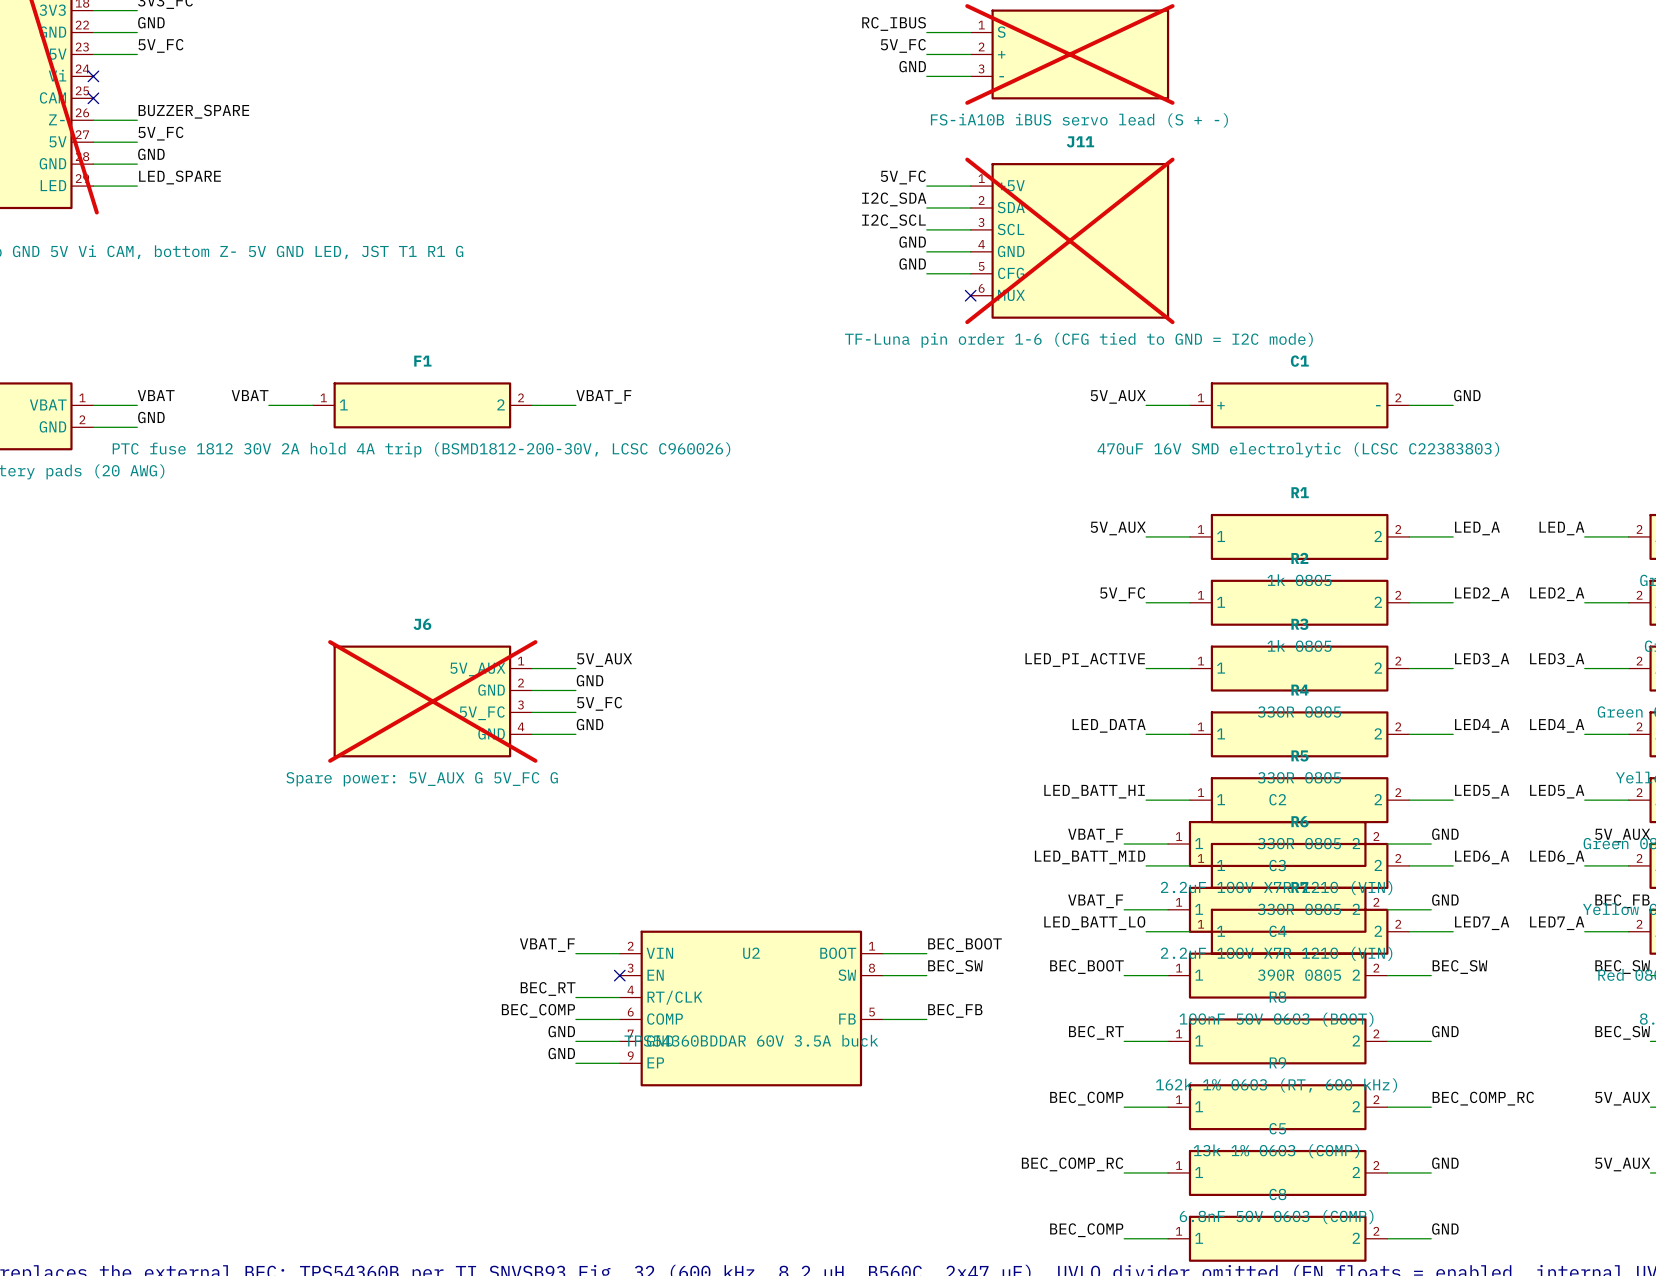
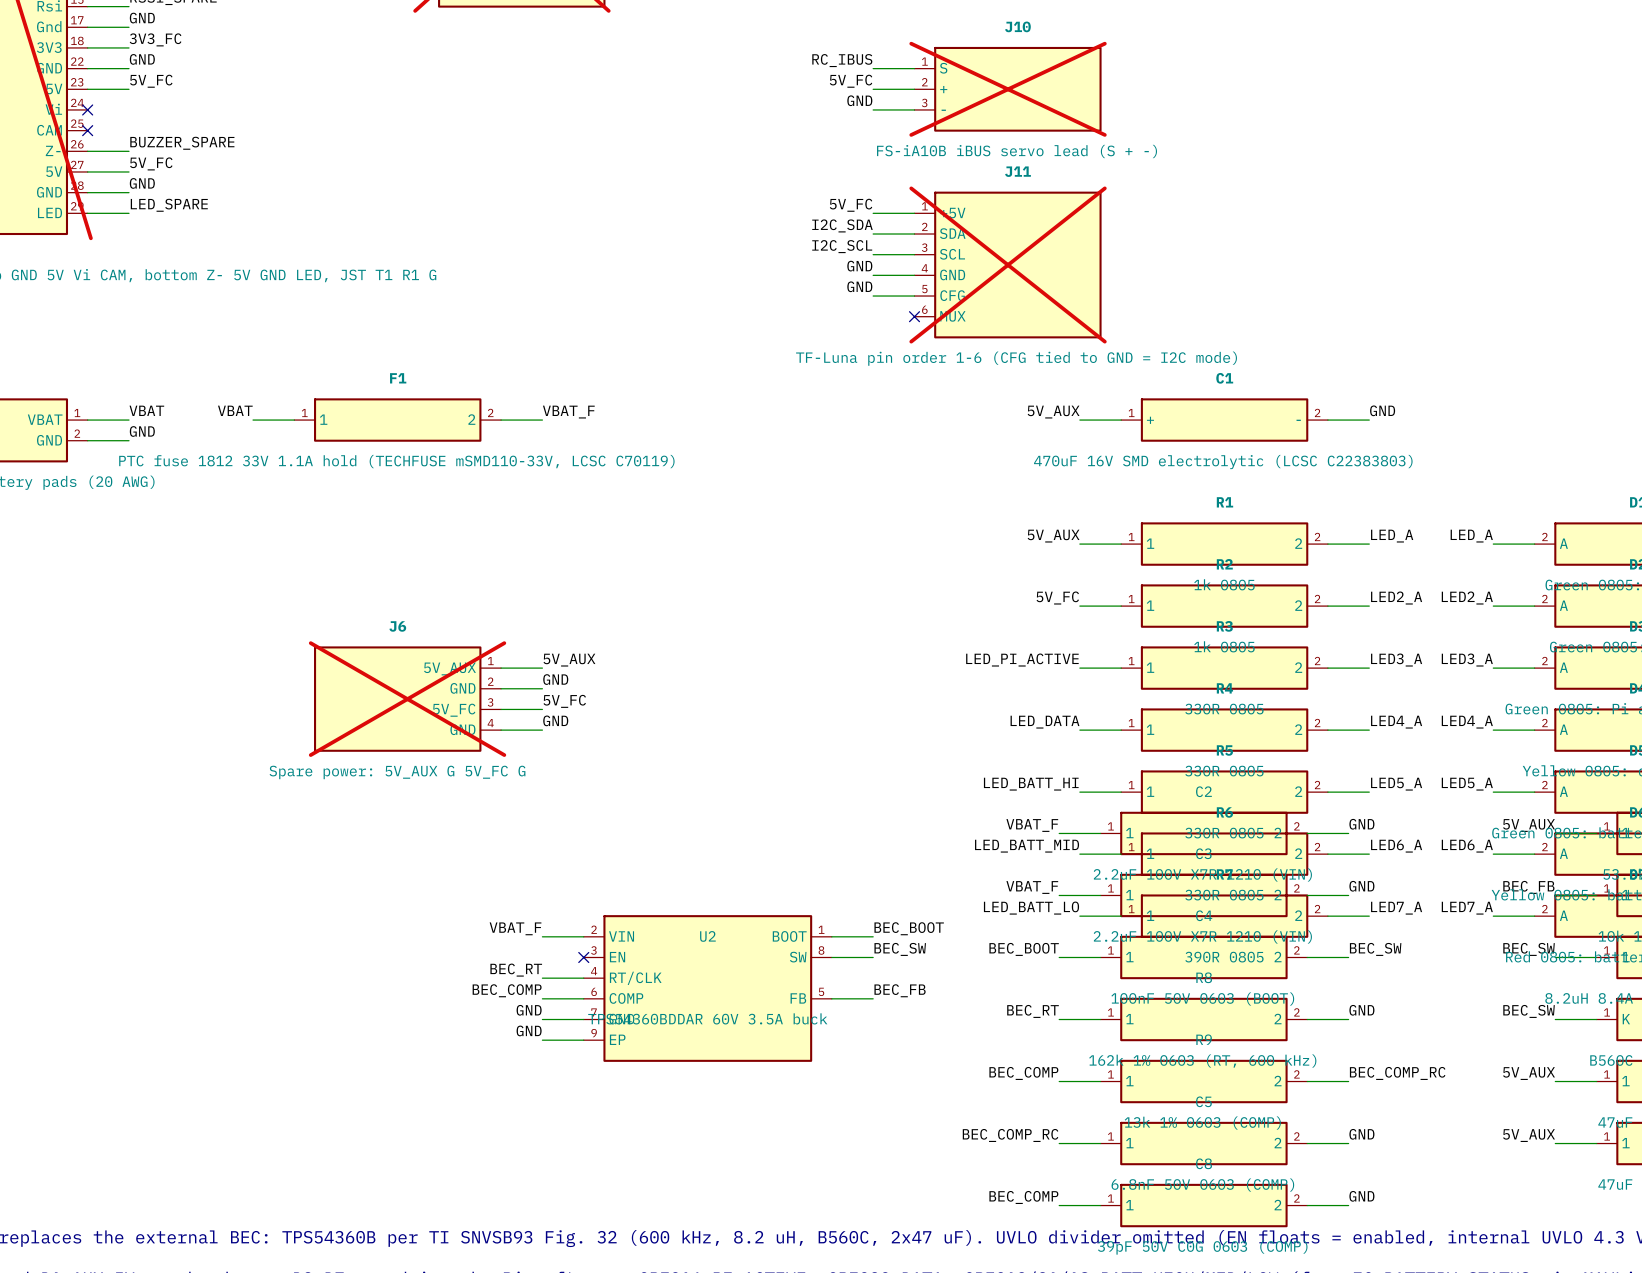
F1 value: PTC fuse 1812 30V 2A hold 4A trip (BSMD1812-200-30V, LCSC C960026) (421, 449) -> PTC fuse 1812 33V 1.1A hold (TECHFUSE mSMD110-33V, LCSC C70119) (396, 461)

